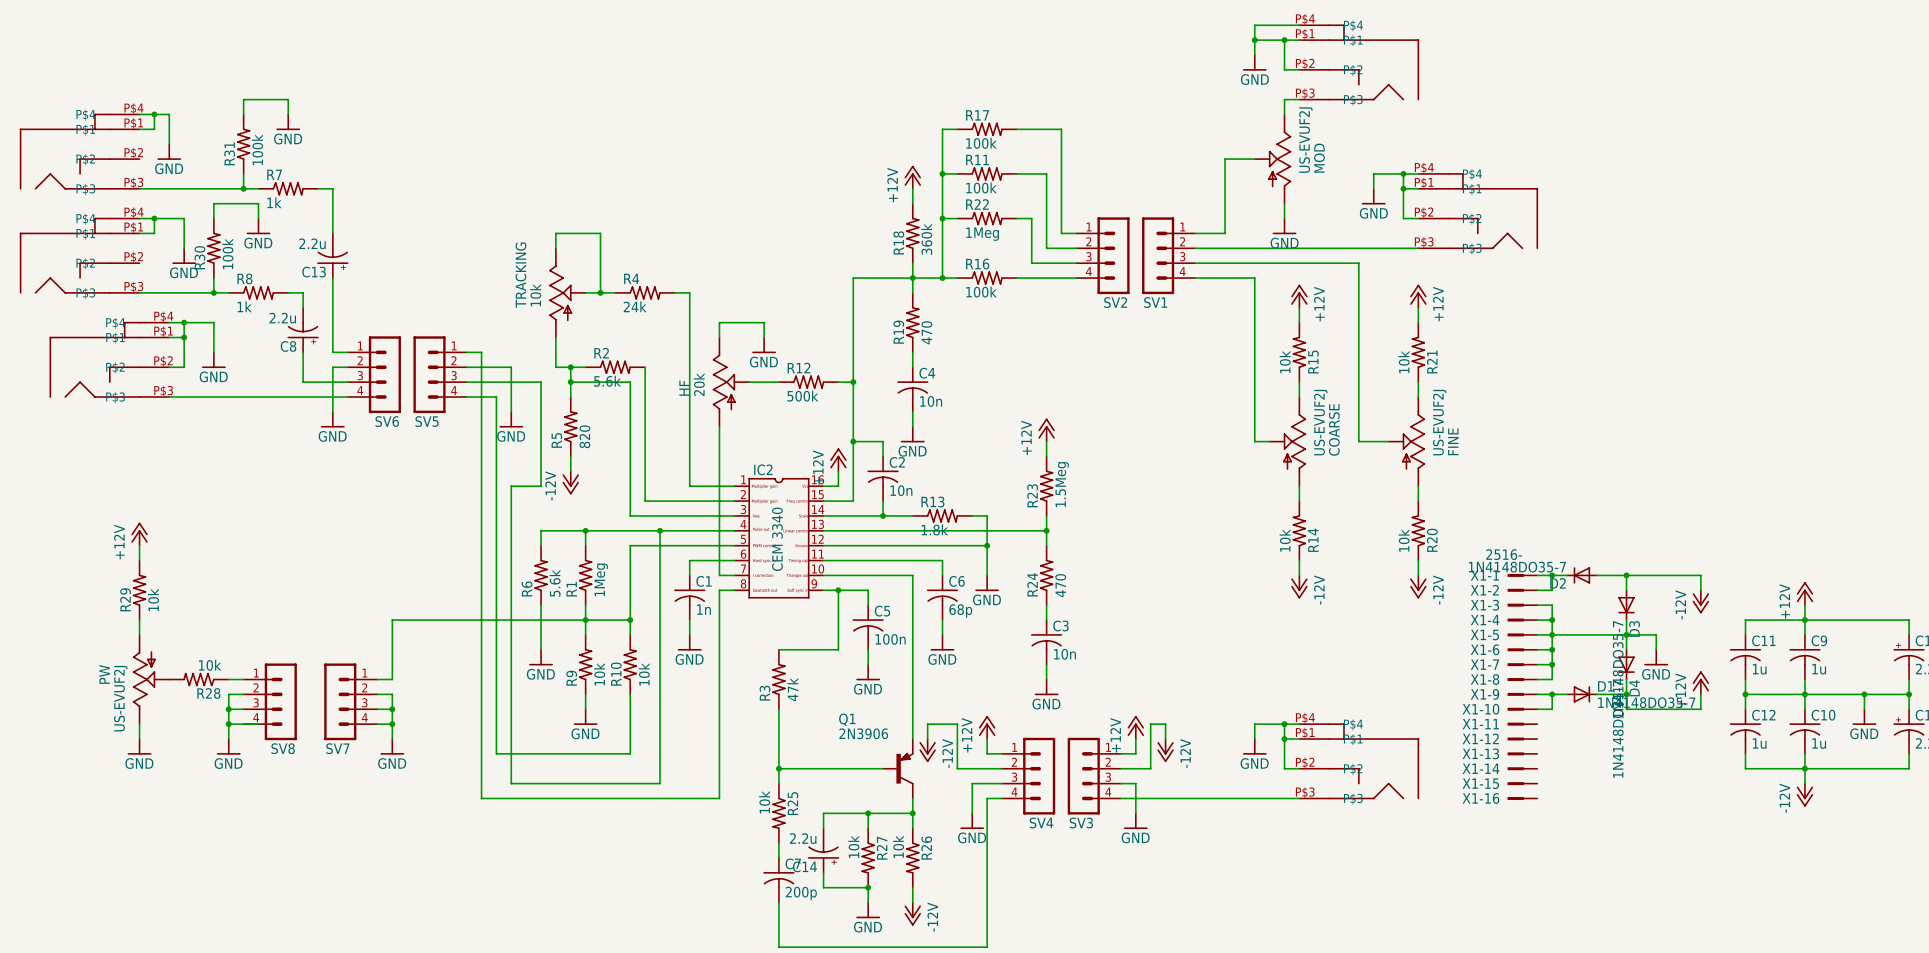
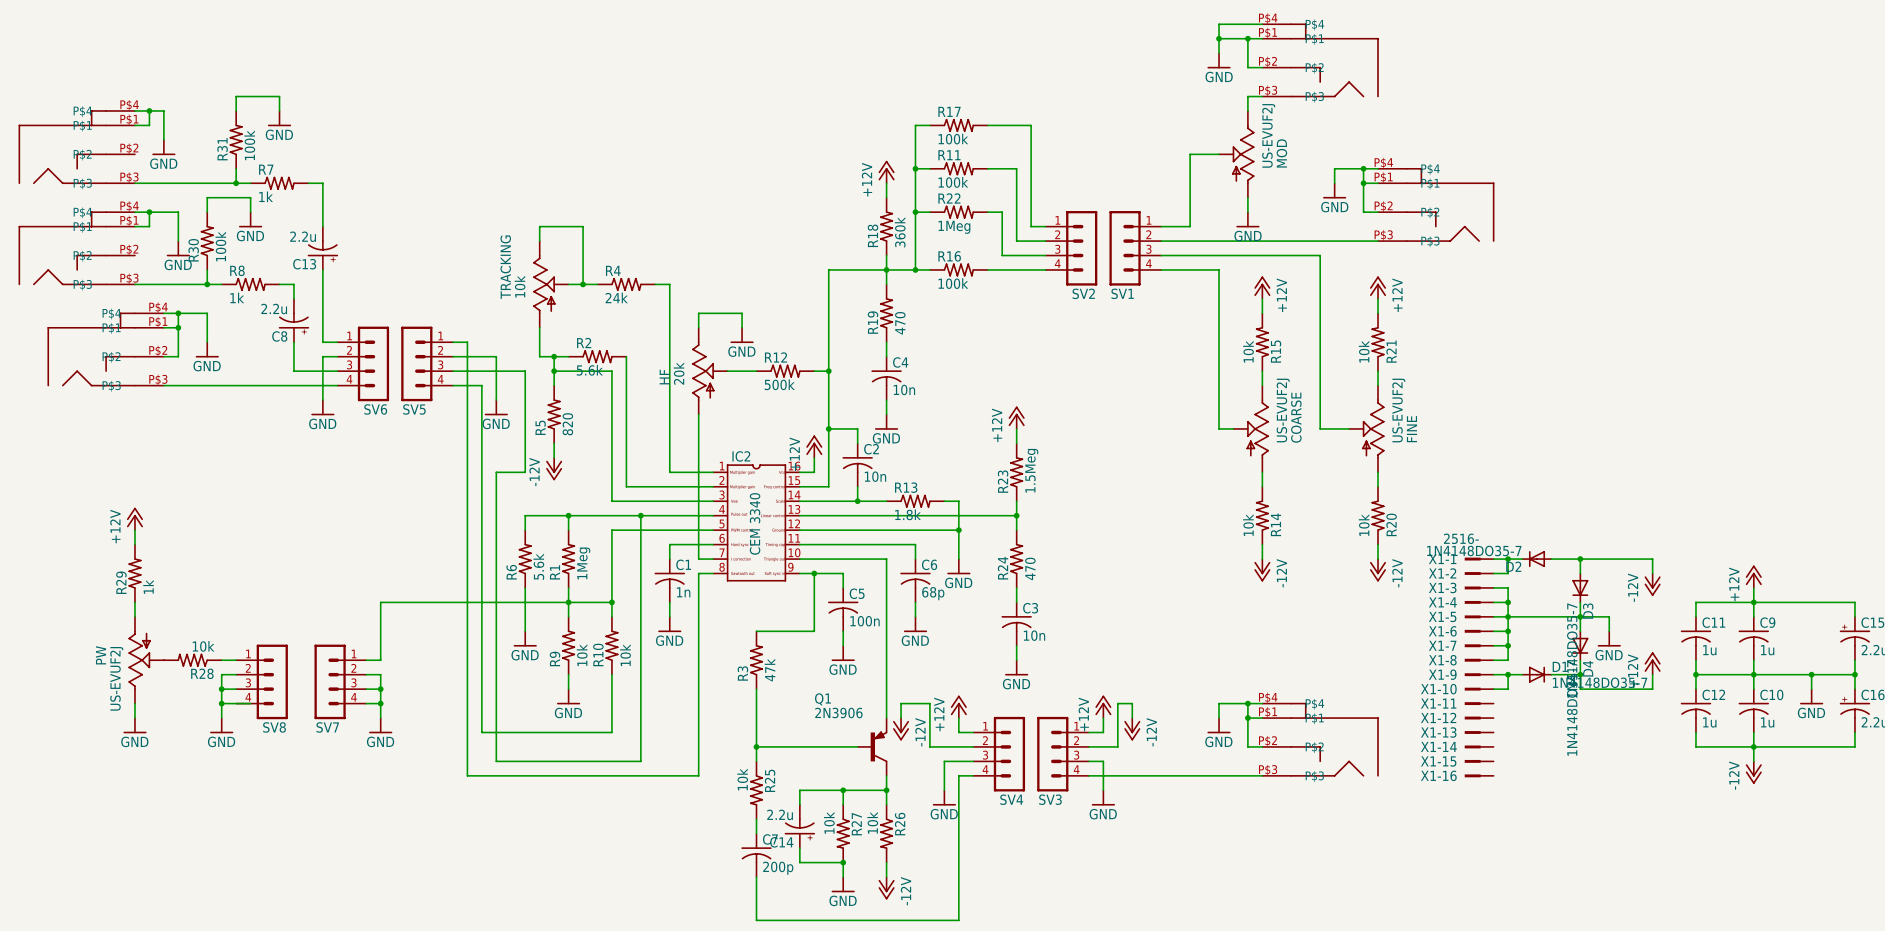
R29 value: 10k (153, 600) -> 1k (148, 586)

